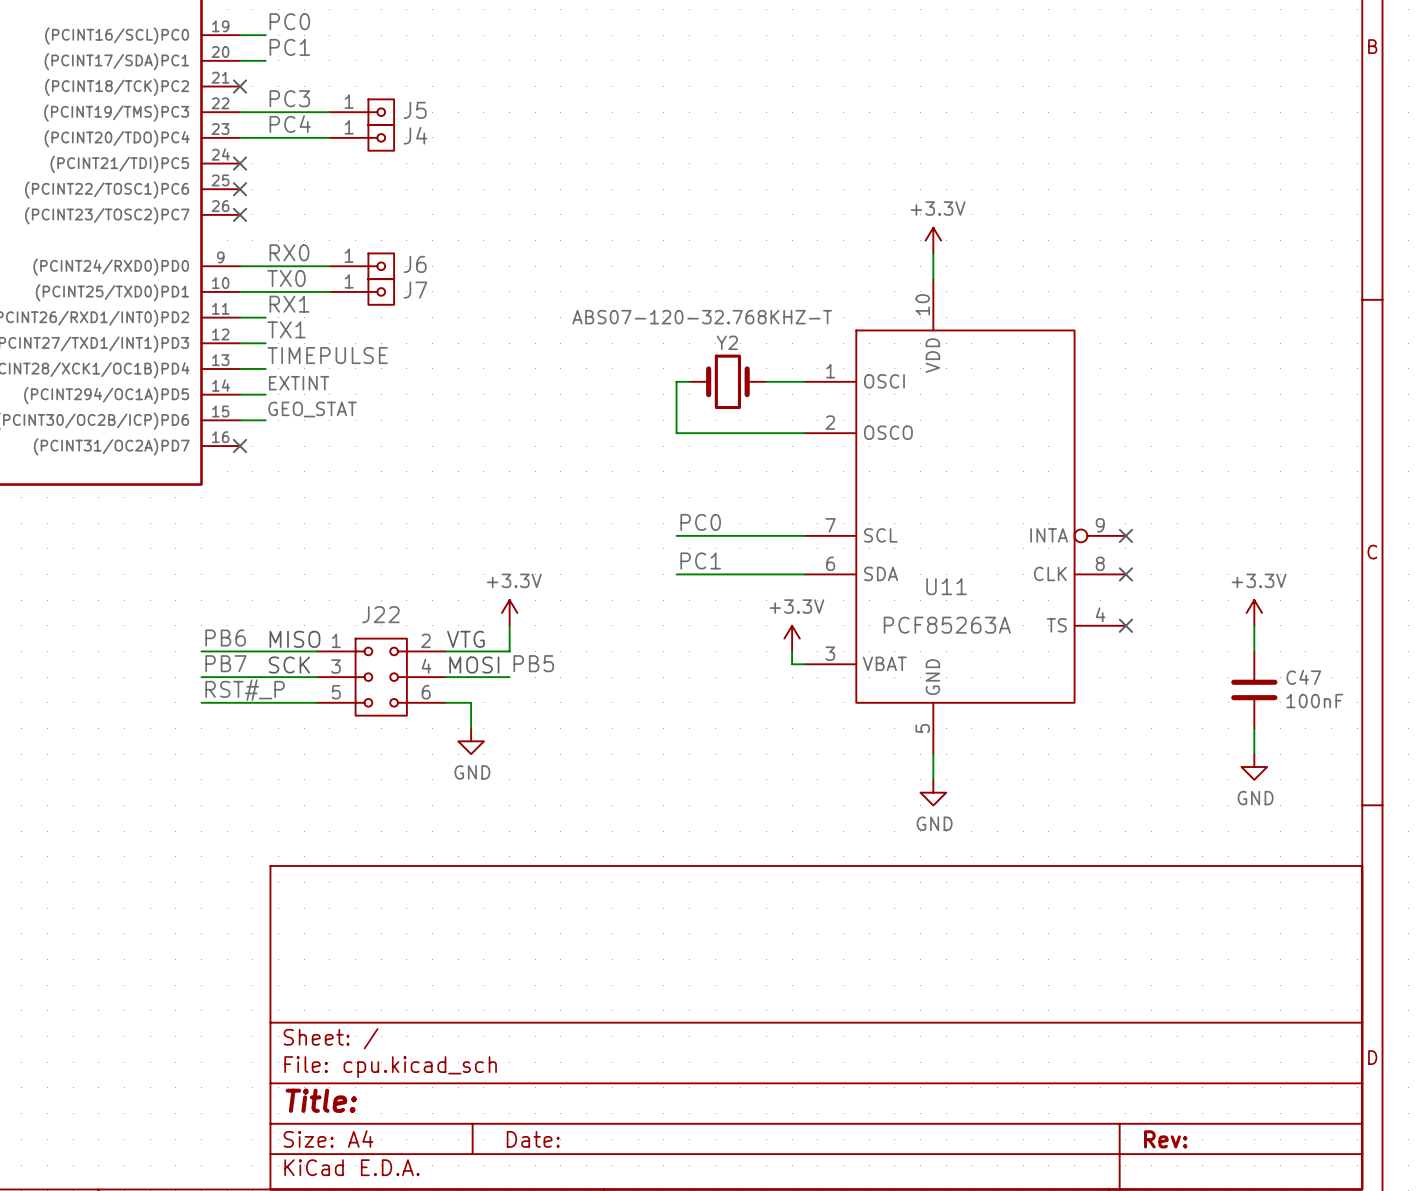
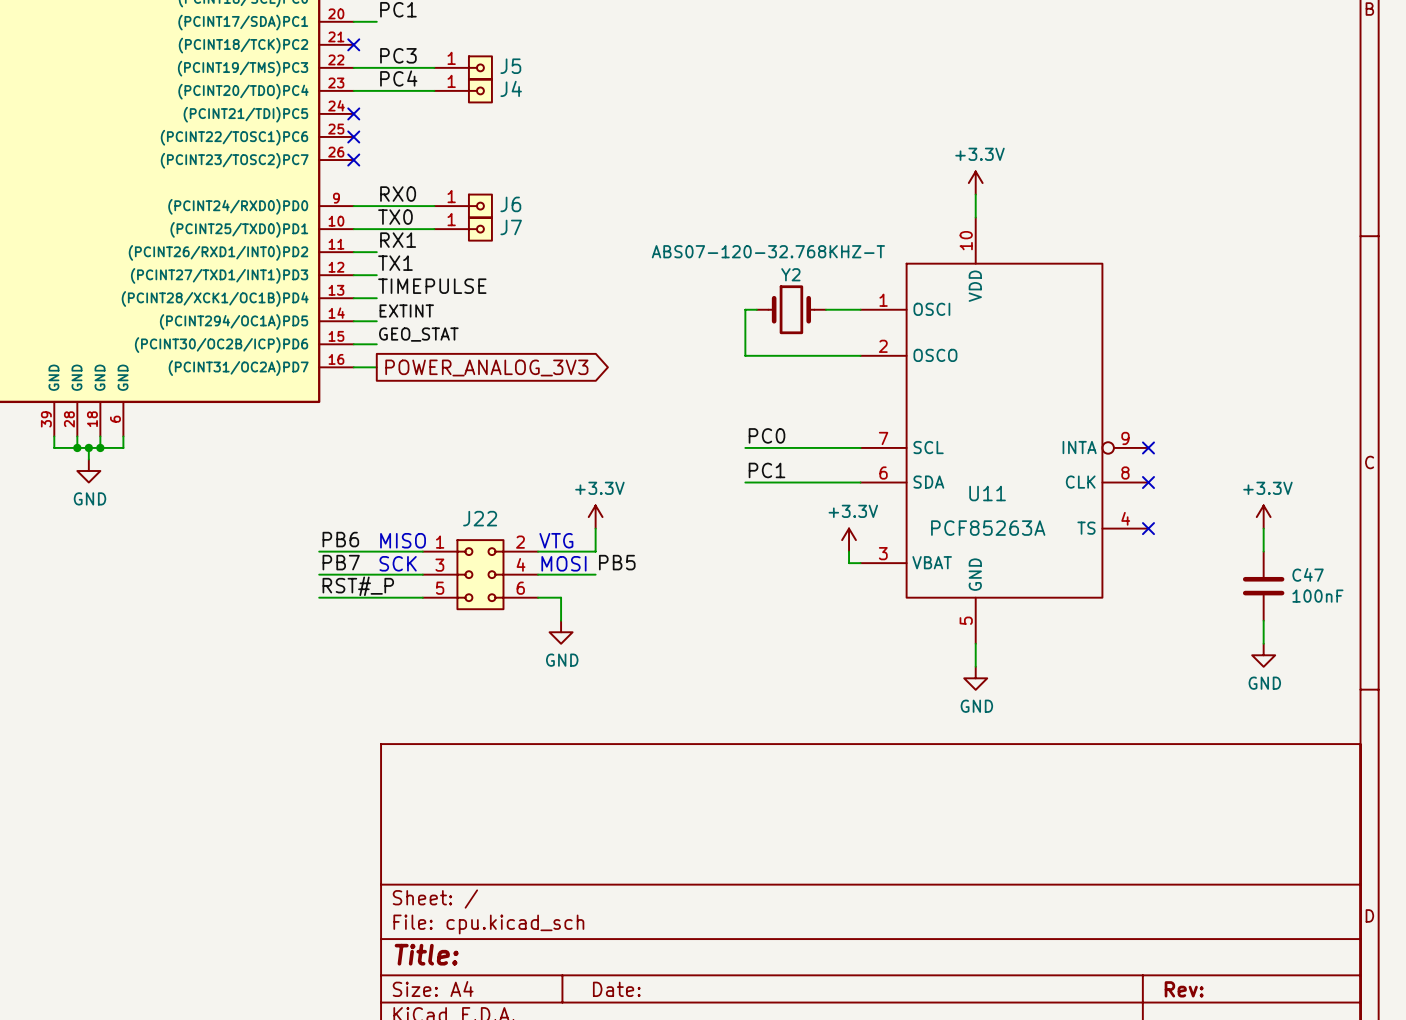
wire: none -> (353, 367) (376, 367)
no-connect mark: (240, 446) -> none
global label: none -> POWER_ANALOG_3V3 (486, 367)

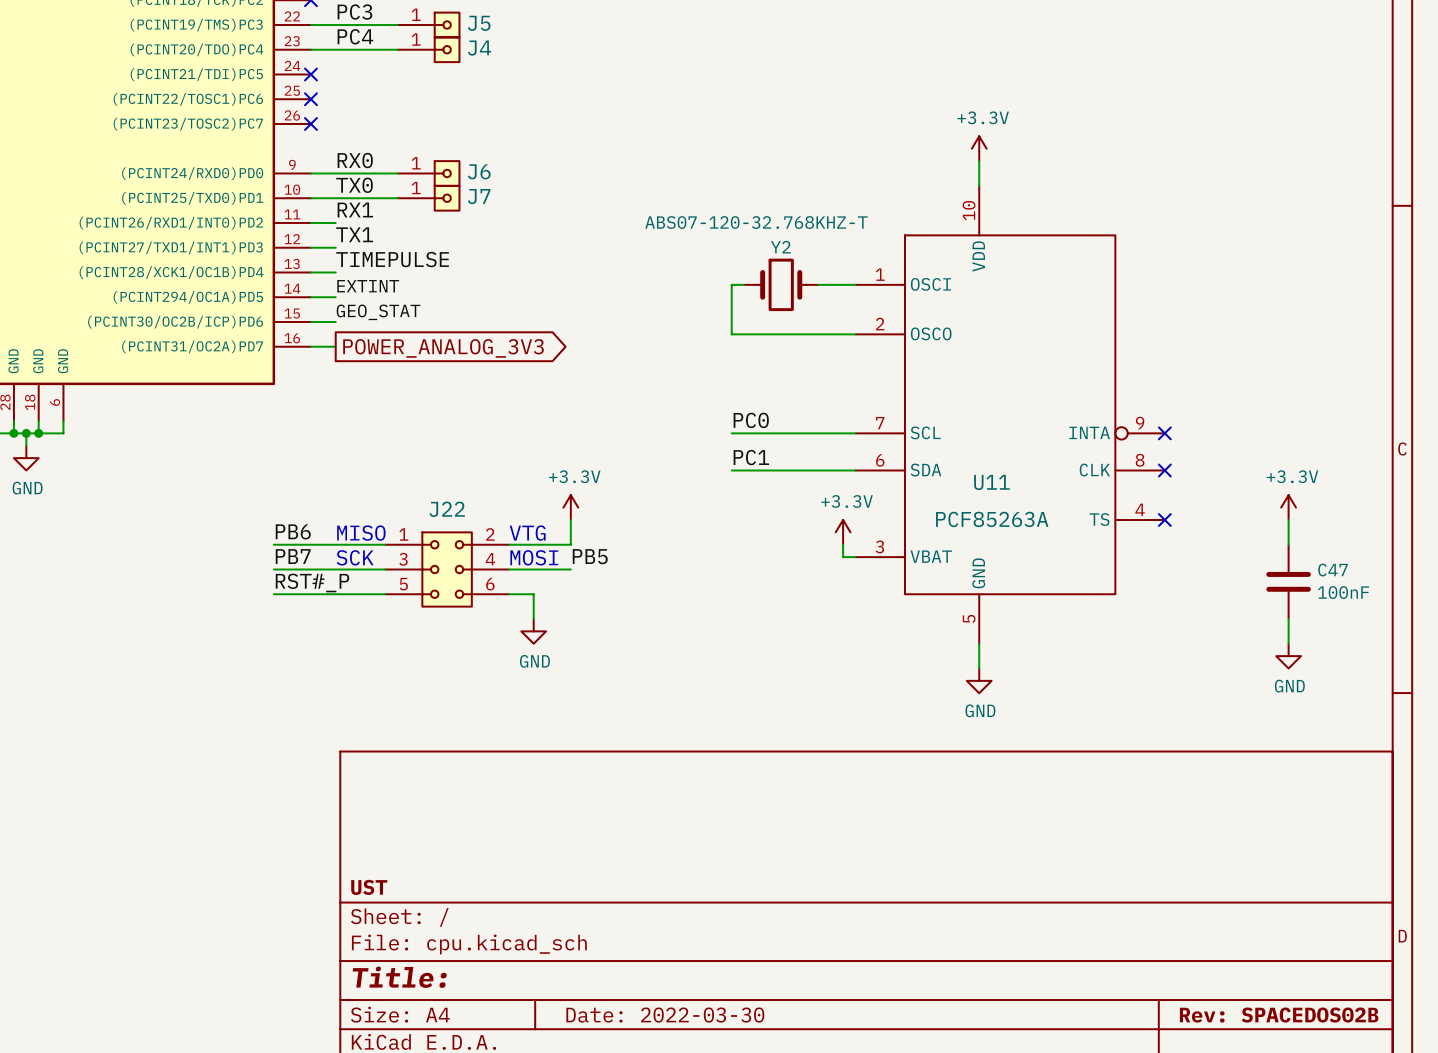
title block: none -> UST (369, 887)
title block: Date: (616, 989) -> Date: 2022-03-30 (665, 1015)
title block: Rev: (1184, 989) -> Rev: SPACEDOS02B (1279, 1015)

